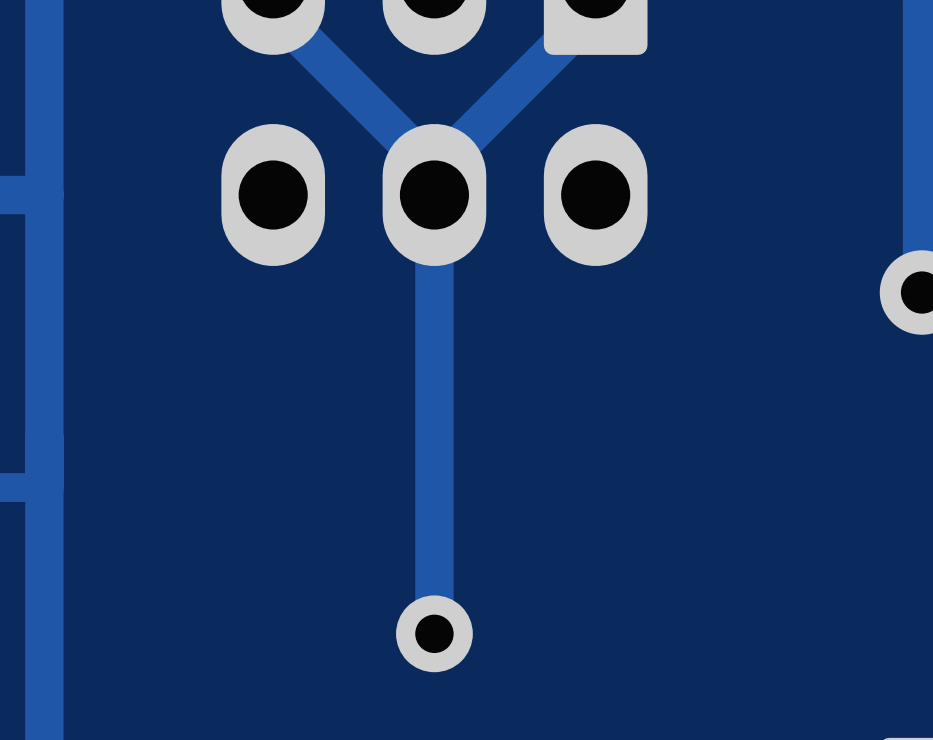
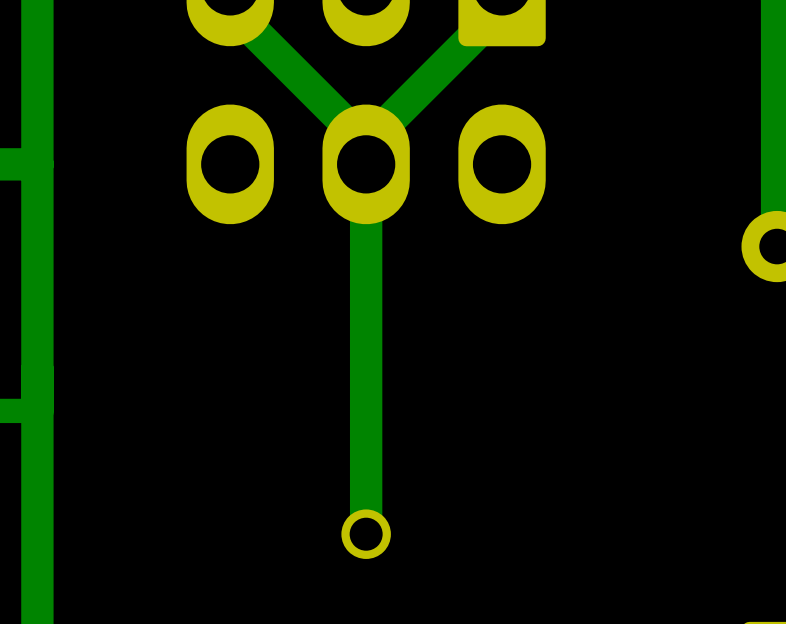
part footprint: [396, 595, 473, 673] -> [341, 509, 391, 559]

